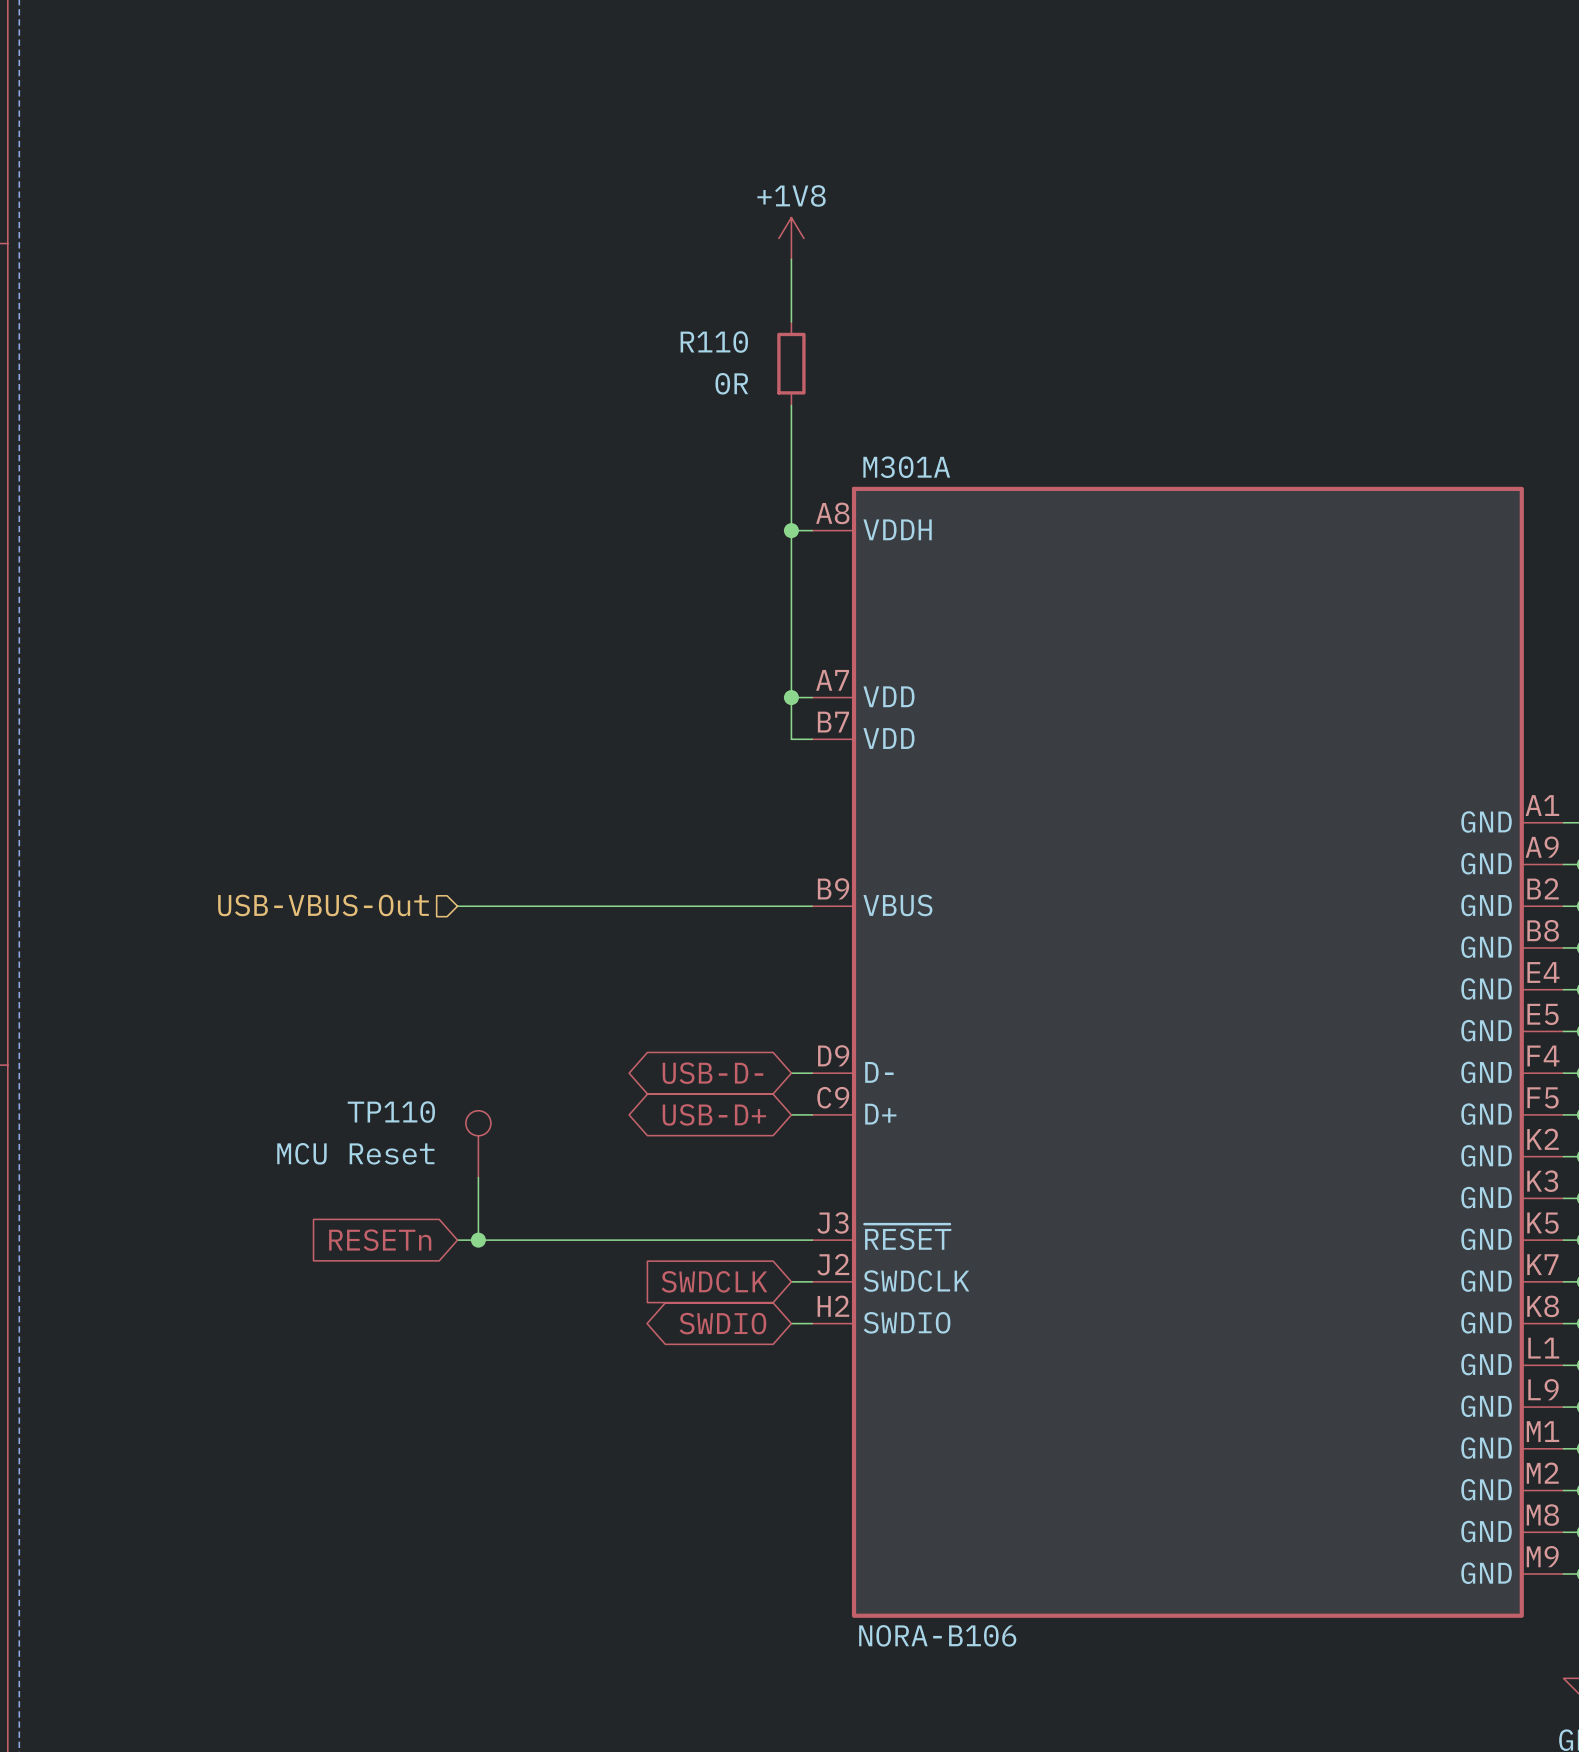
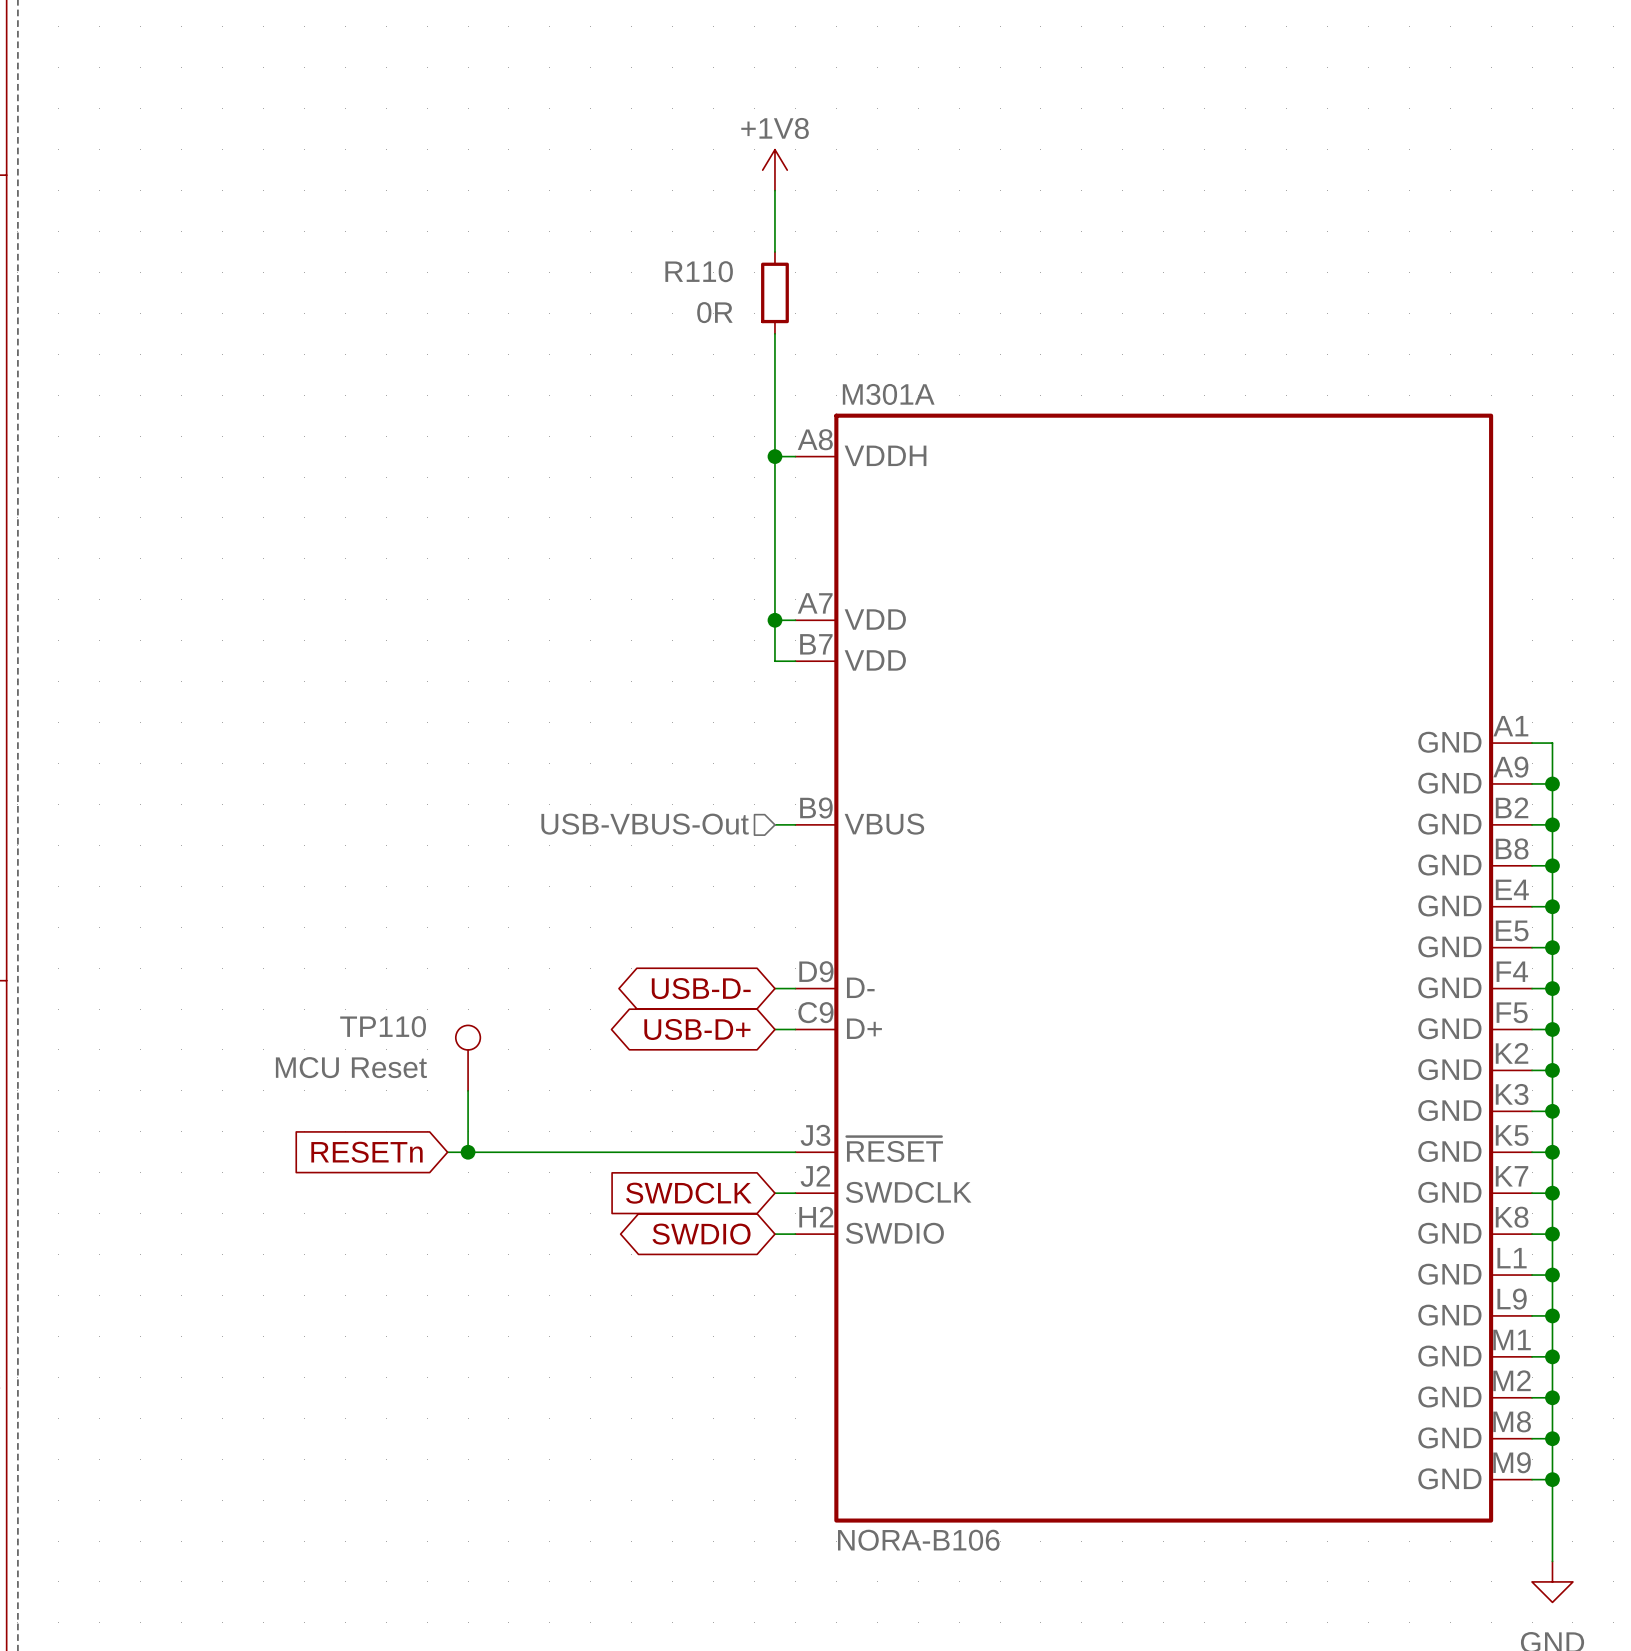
hierarchical label position: USB-VBUS-Out (323, 905) -> USB-VBUS-Out (645, 824)
wire: (457, 906) (791, 906) -> none

